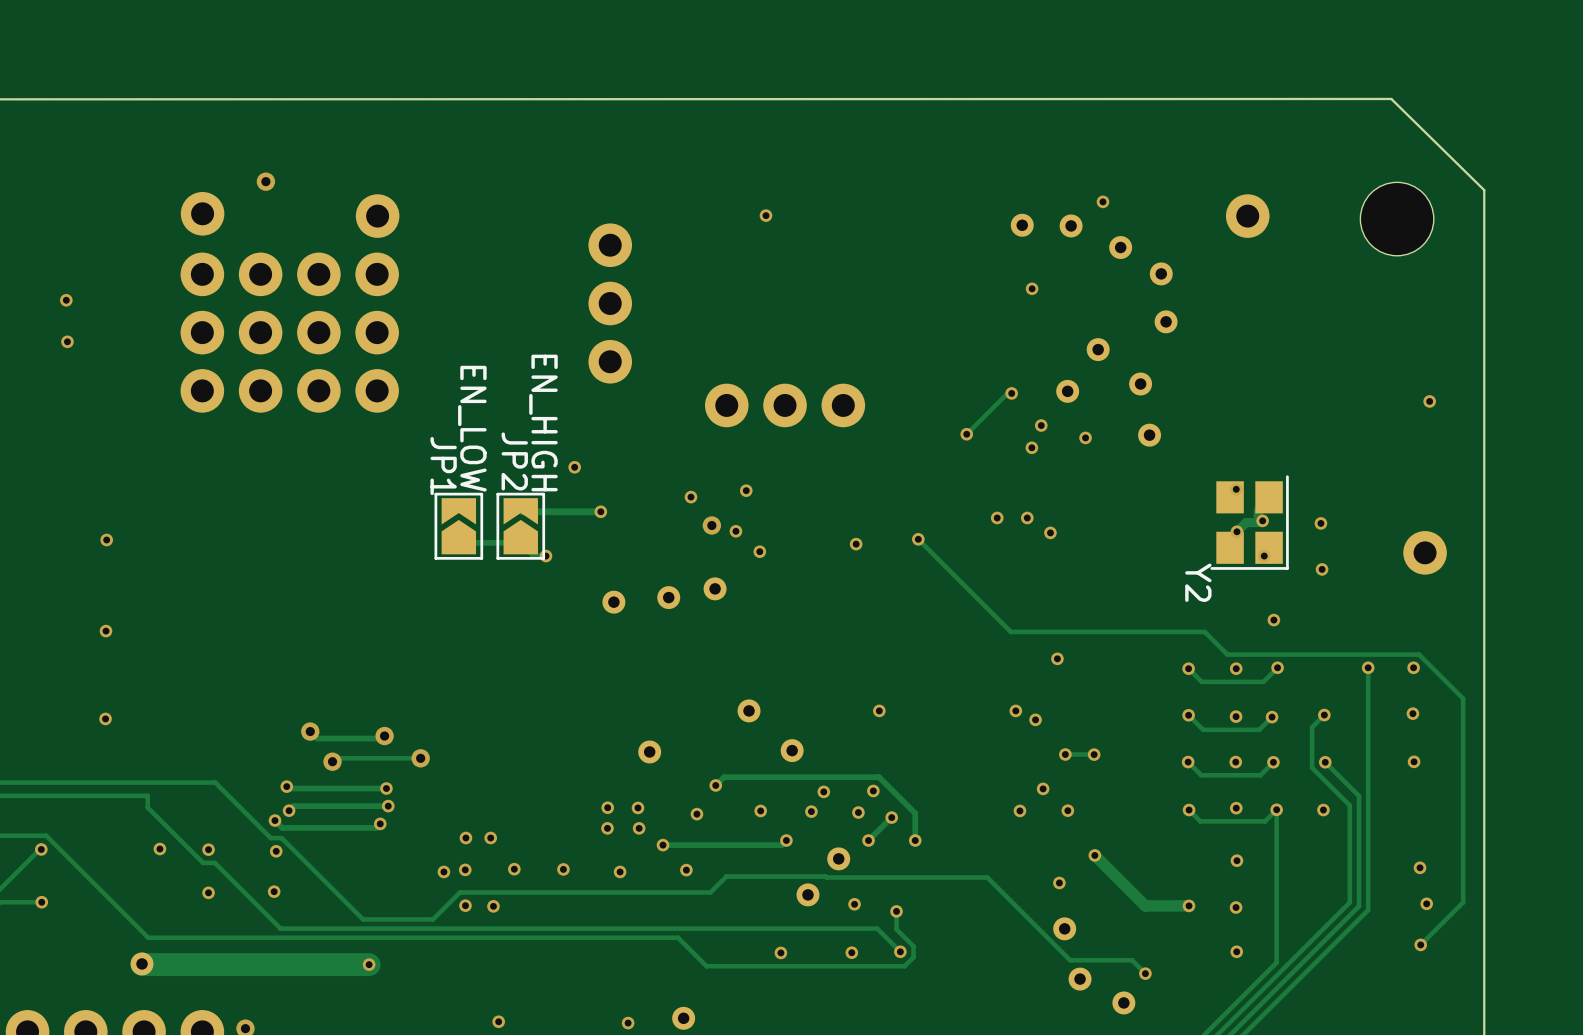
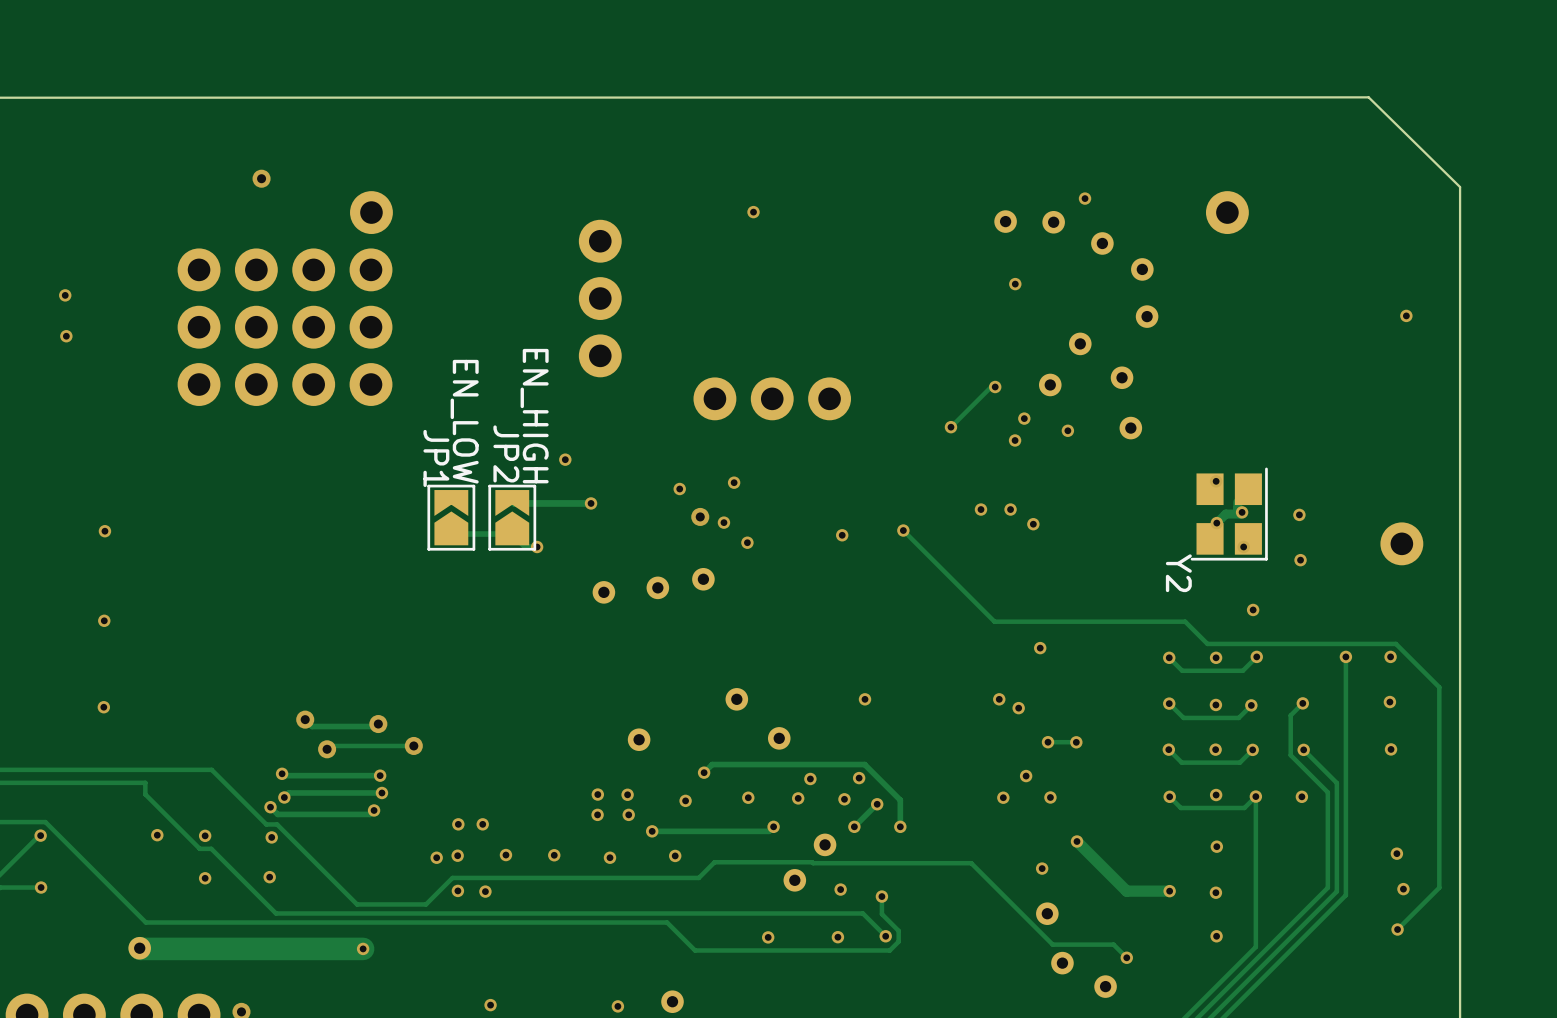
part: (202, 213) -> none
part: (1397, 219) -> none
via position: (1429, 401) -> (1406, 315)

